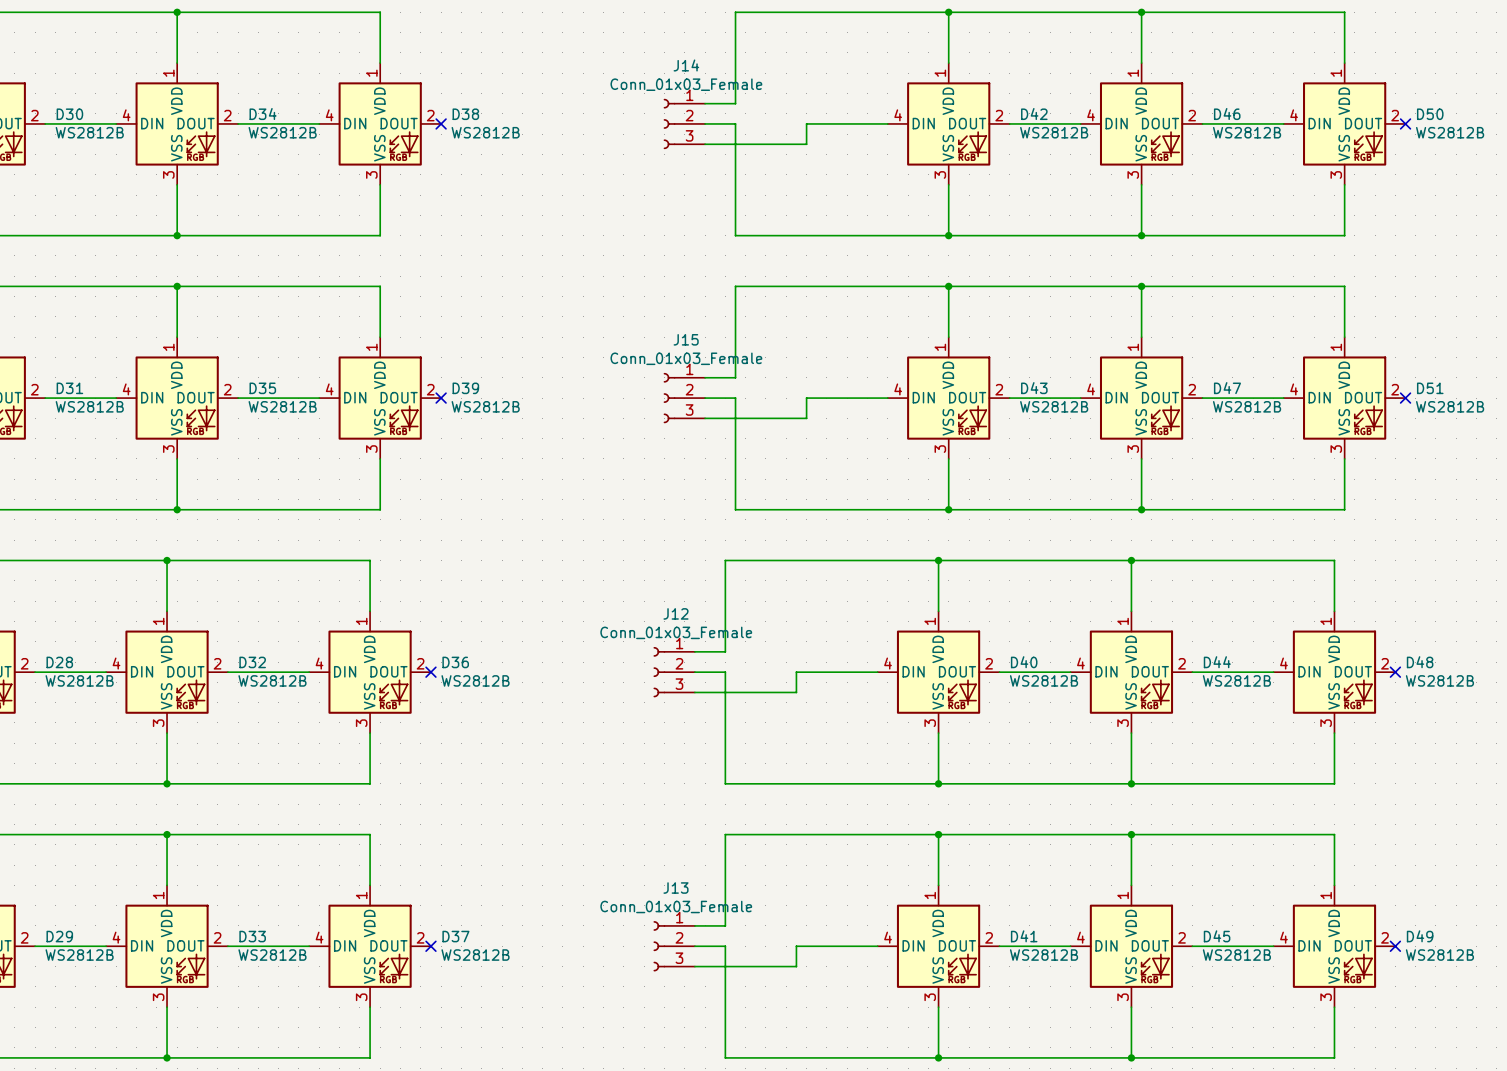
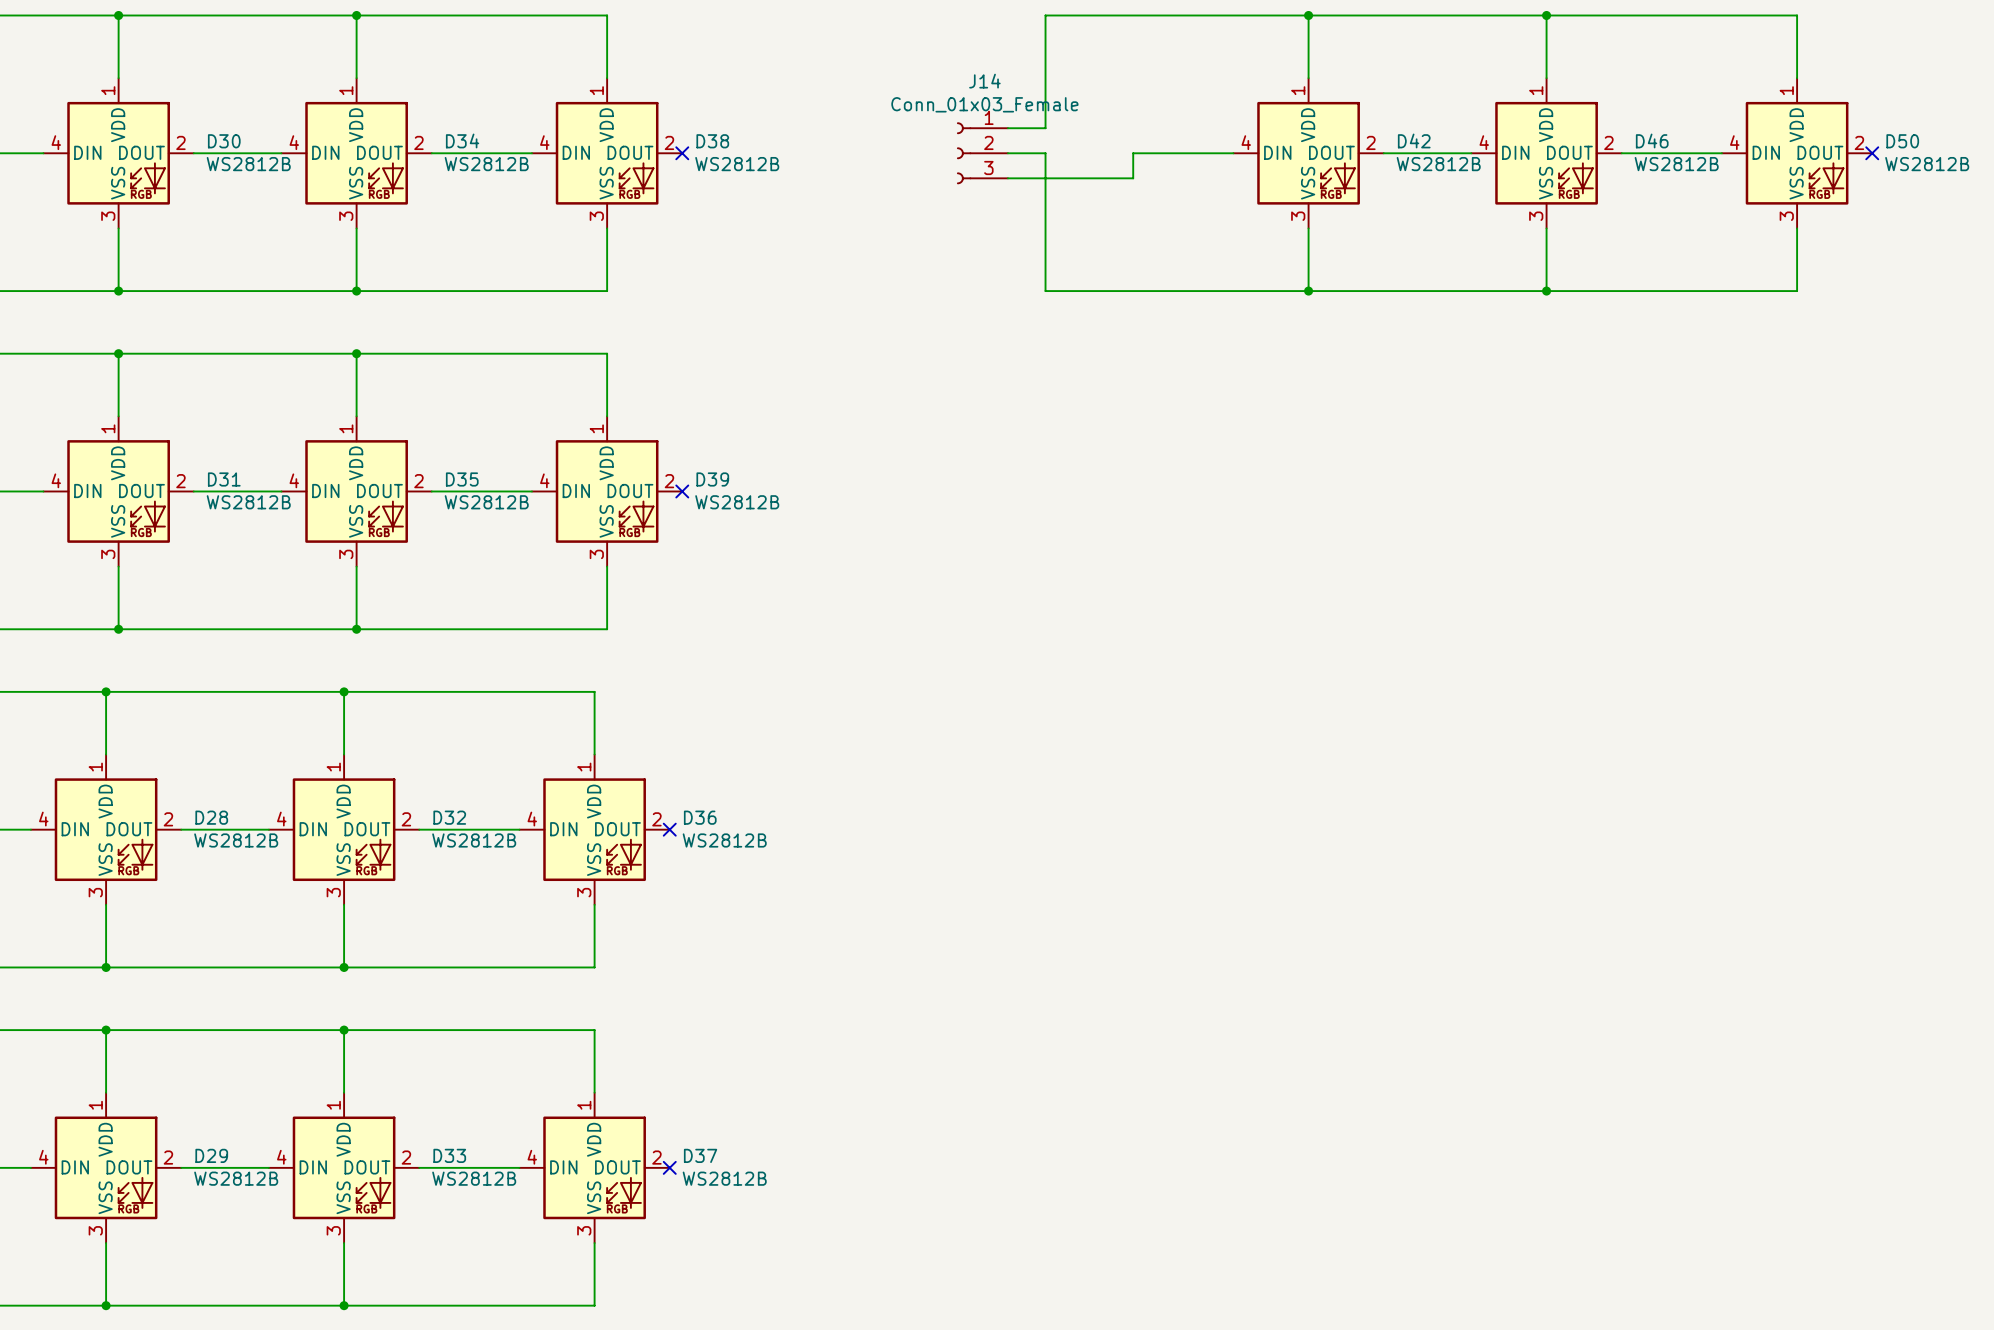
wire: (948, 286) (948, 337) -> none
junction: (948, 286) -> none
wire: (1141, 286) (1141, 337) -> none
junction: (1141, 286) -> none
wire: (1344, 337) (1344, 286) (735, 286) (735, 377) (705, 377) -> none
J15: Conn_01x03_Female (684, 398) -> none
wire: (705, 398) (735, 398) (735, 509) (1344, 509) (1344, 458) -> none
wire: (887, 398) (806, 398) (806, 418) (705, 418) -> none
D43: WS2812B (948, 398) -> none
wire: (1009, 398) (1080, 398) -> none
D47: WS2812B (1141, 398) -> none
wire: (1202, 398) (1283, 398) -> none
D51: WS2812B (1344, 398) -> none
no-connect mark: (1405, 398) -> none
wire: (948, 458) (948, 509) -> none
wire: (1141, 458) (1141, 509) -> none
junction: (948, 509) -> none
junction: (1141, 509) -> none
wire: (938, 560) (938, 611) -> none
junction: (938, 560) -> none
wire: (1131, 560) (1131, 611) -> none
junction: (1131, 560) -> none
wire: (1334, 611) (1334, 560) (725, 560) (725, 651) (694, 651) -> none
J12: Conn_01x03_Female (674, 672) -> none
wire: (694, 672) (725, 672) (725, 783) (1334, 783) (1334, 733) -> none
wire: (877, 672) (796, 672) (796, 692) (694, 692) -> none
D40: WS2812B (938, 672) -> none
wire: (999, 672) (1070, 672) -> none
D44: WS2812B (1131, 672) -> none
wire: (1192, 672) (1273, 672) -> none
D48: WS2812B (1334, 672) -> none
no-connect mark: (1395, 672) -> none
wire: (938, 733) (938, 783) -> none
wire: (1131, 733) (1131, 783) -> none
junction: (938, 783) -> none
junction: (1131, 783) -> none
wire: (938, 834) (938, 885) -> none
junction: (938, 834) -> none
wire: (1131, 834) (1131, 885) -> none
junction: (1131, 834) -> none
wire: (1334, 885) (1334, 834) (725, 834) (725, 925) (694, 925) -> none
J13: Conn_01x03_Female (674, 946) -> none
wire: (694, 946) (725, 946) (725, 1057) (1334, 1057) (1334, 1007) -> none
wire: (877, 946) (796, 946) (796, 966) (694, 966) -> none
D41: WS2812B (938, 946) -> none
wire: (999, 946) (1070, 946) -> none
D45: WS2812B (1131, 946) -> none
wire: (1192, 946) (1273, 946) -> none
D49: WS2812B (1334, 946) -> none
no-connect mark: (1395, 946) -> none
wire: (938, 1007) (938, 1057) -> none
wire: (1131, 1007) (1131, 1057) -> none
junction: (938, 1057) -> none
junction: (1131, 1057) -> none

